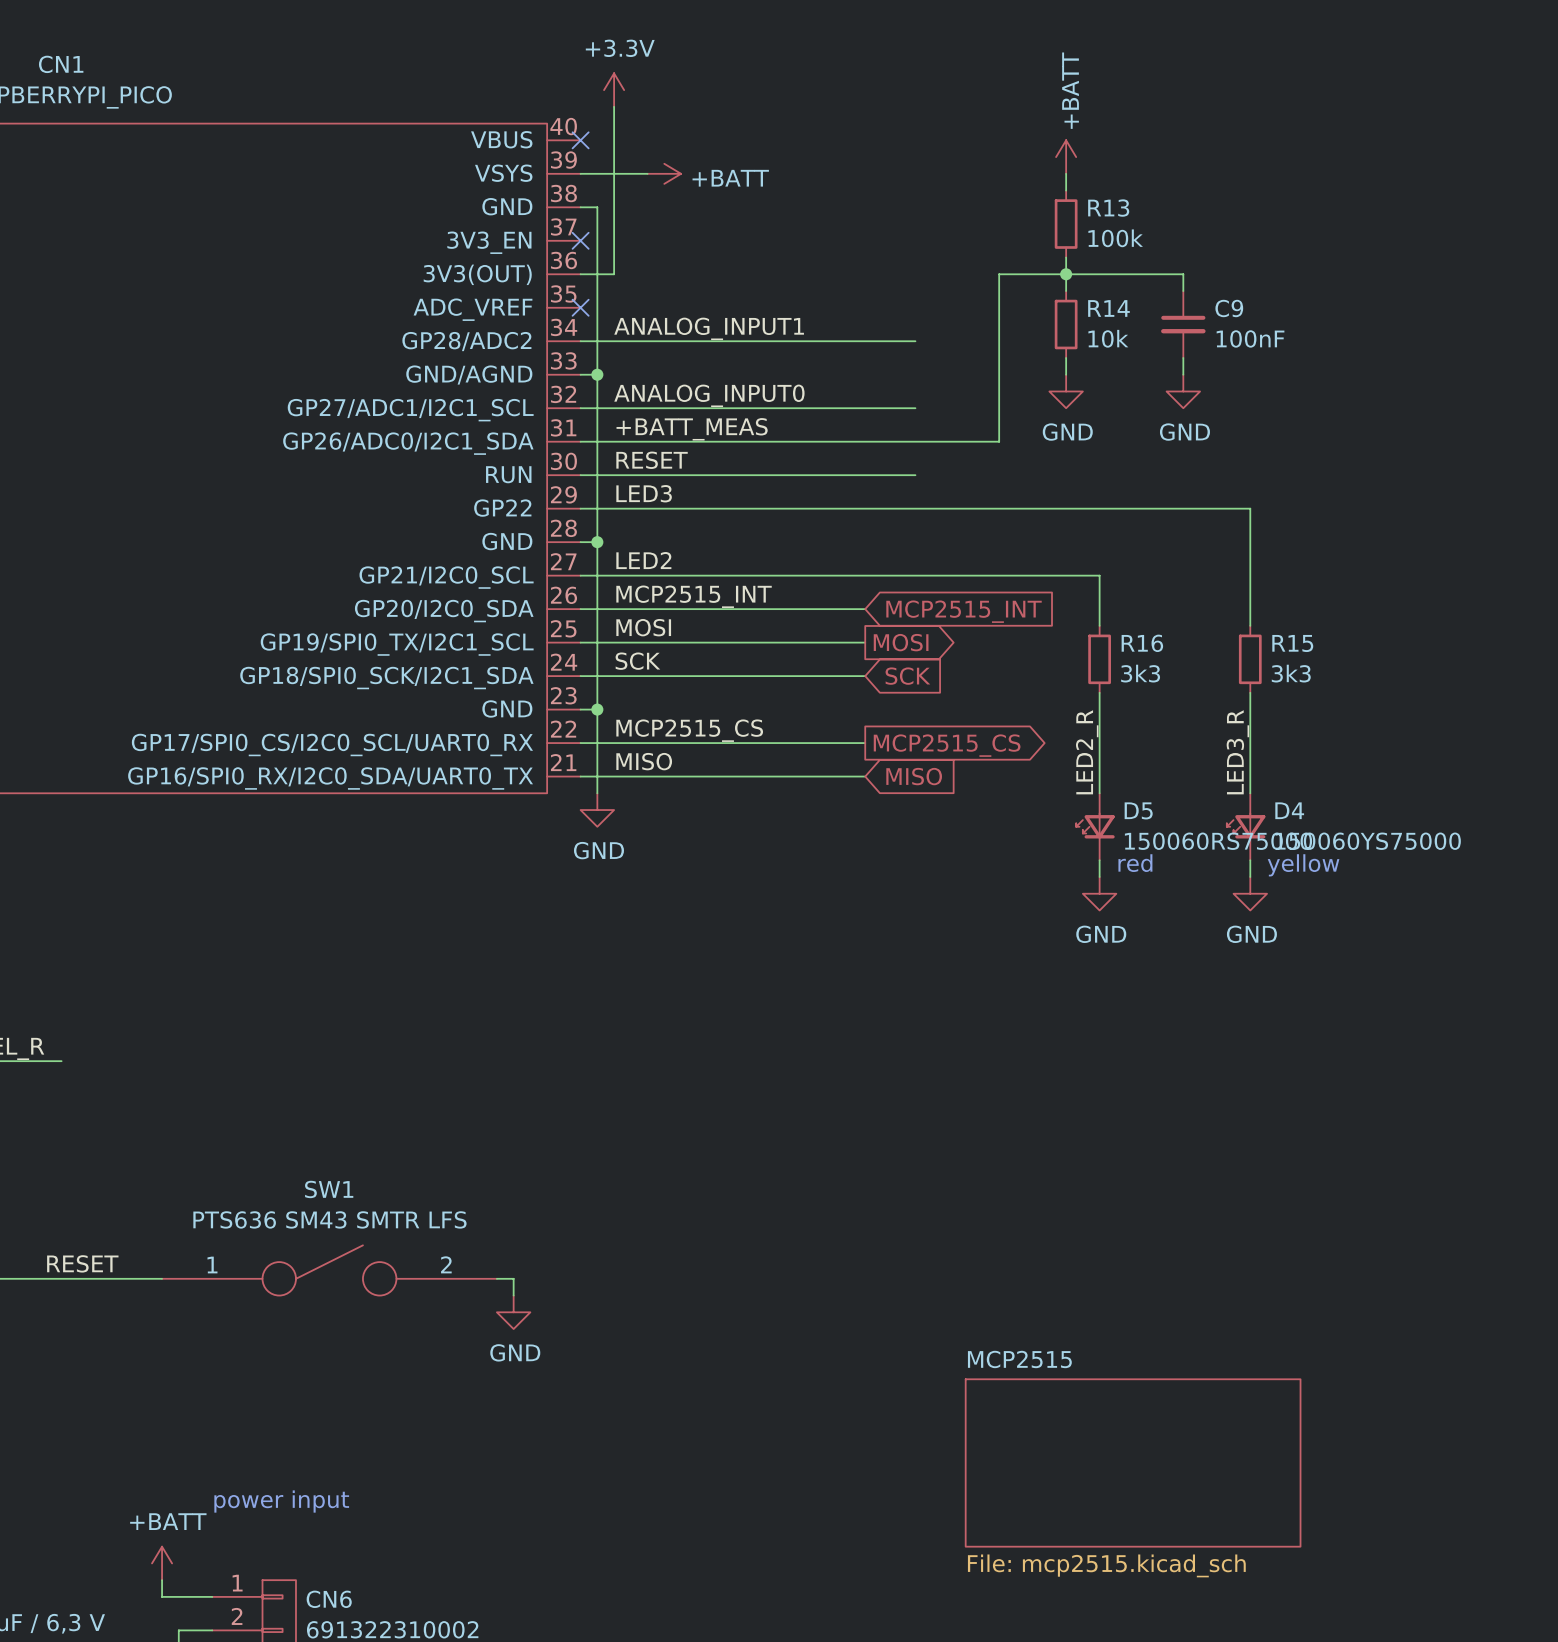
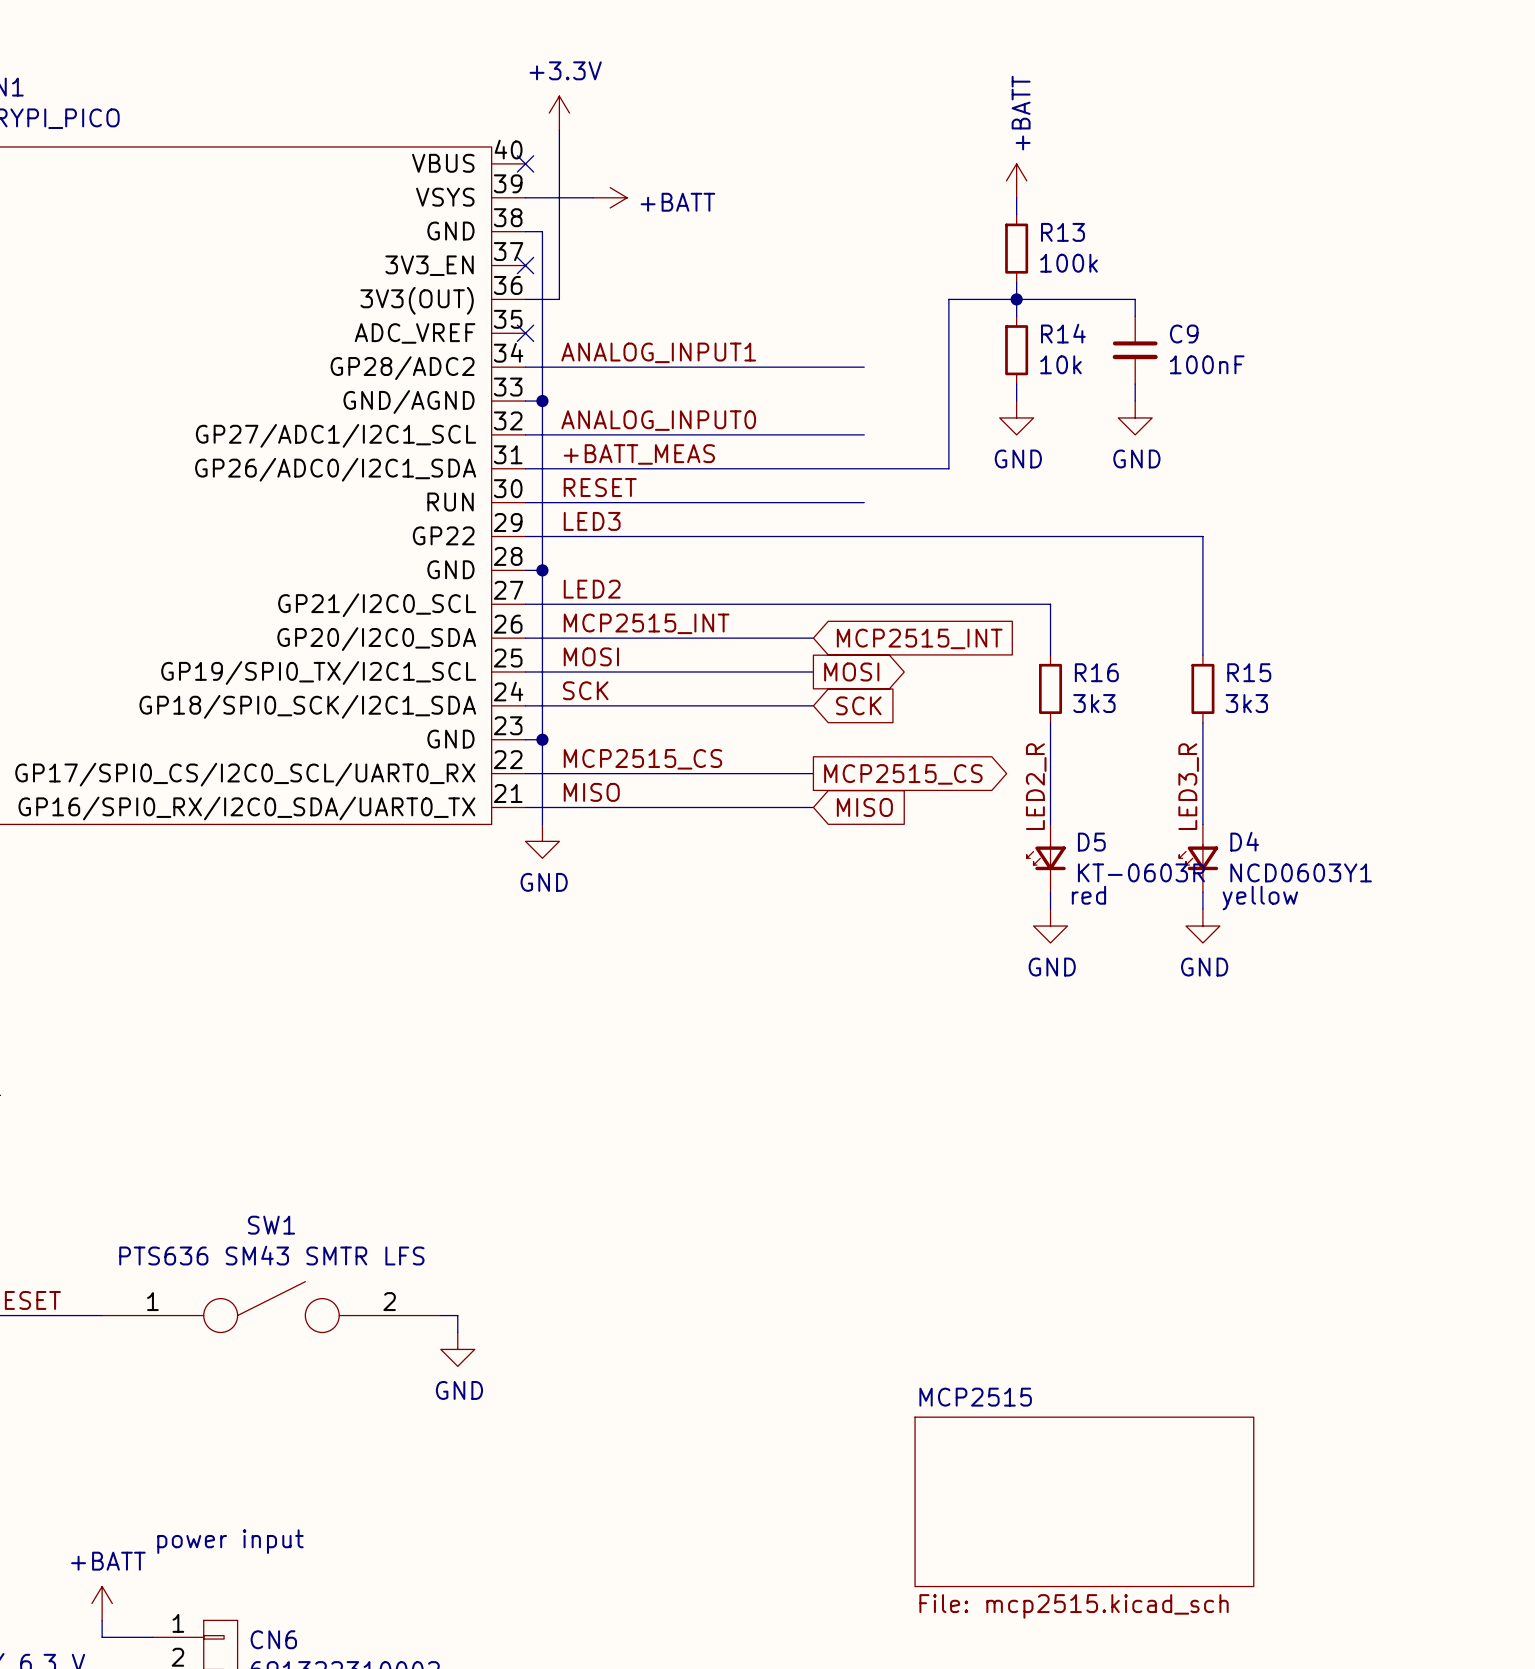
D5 value: 150060RS75000 (1218, 841) -> KT-0603R (1141, 872)
D4 value: 150060YS75000 (1368, 841) -> NCD0603Y1 (1301, 872)

